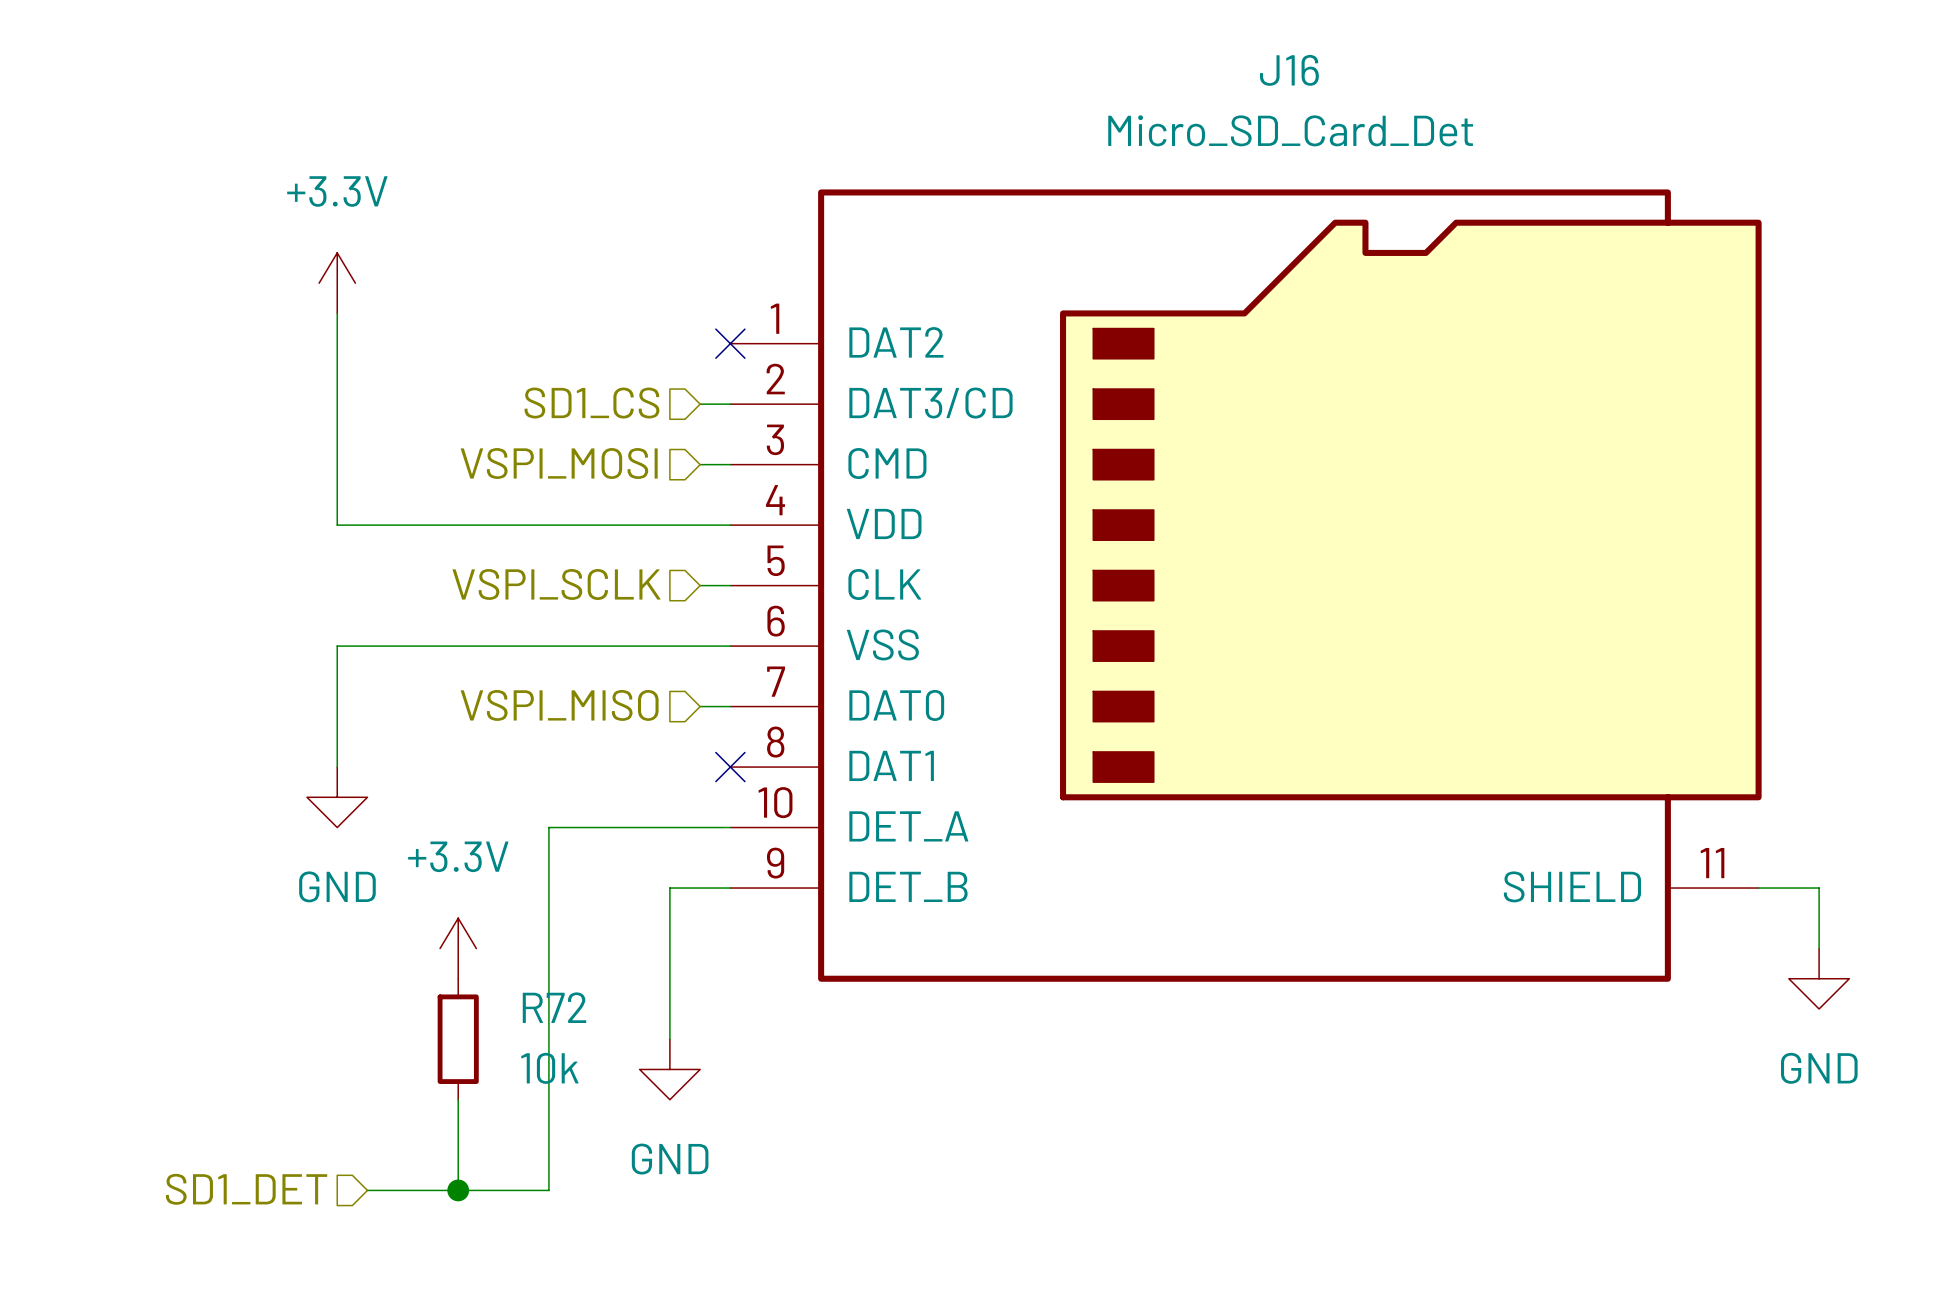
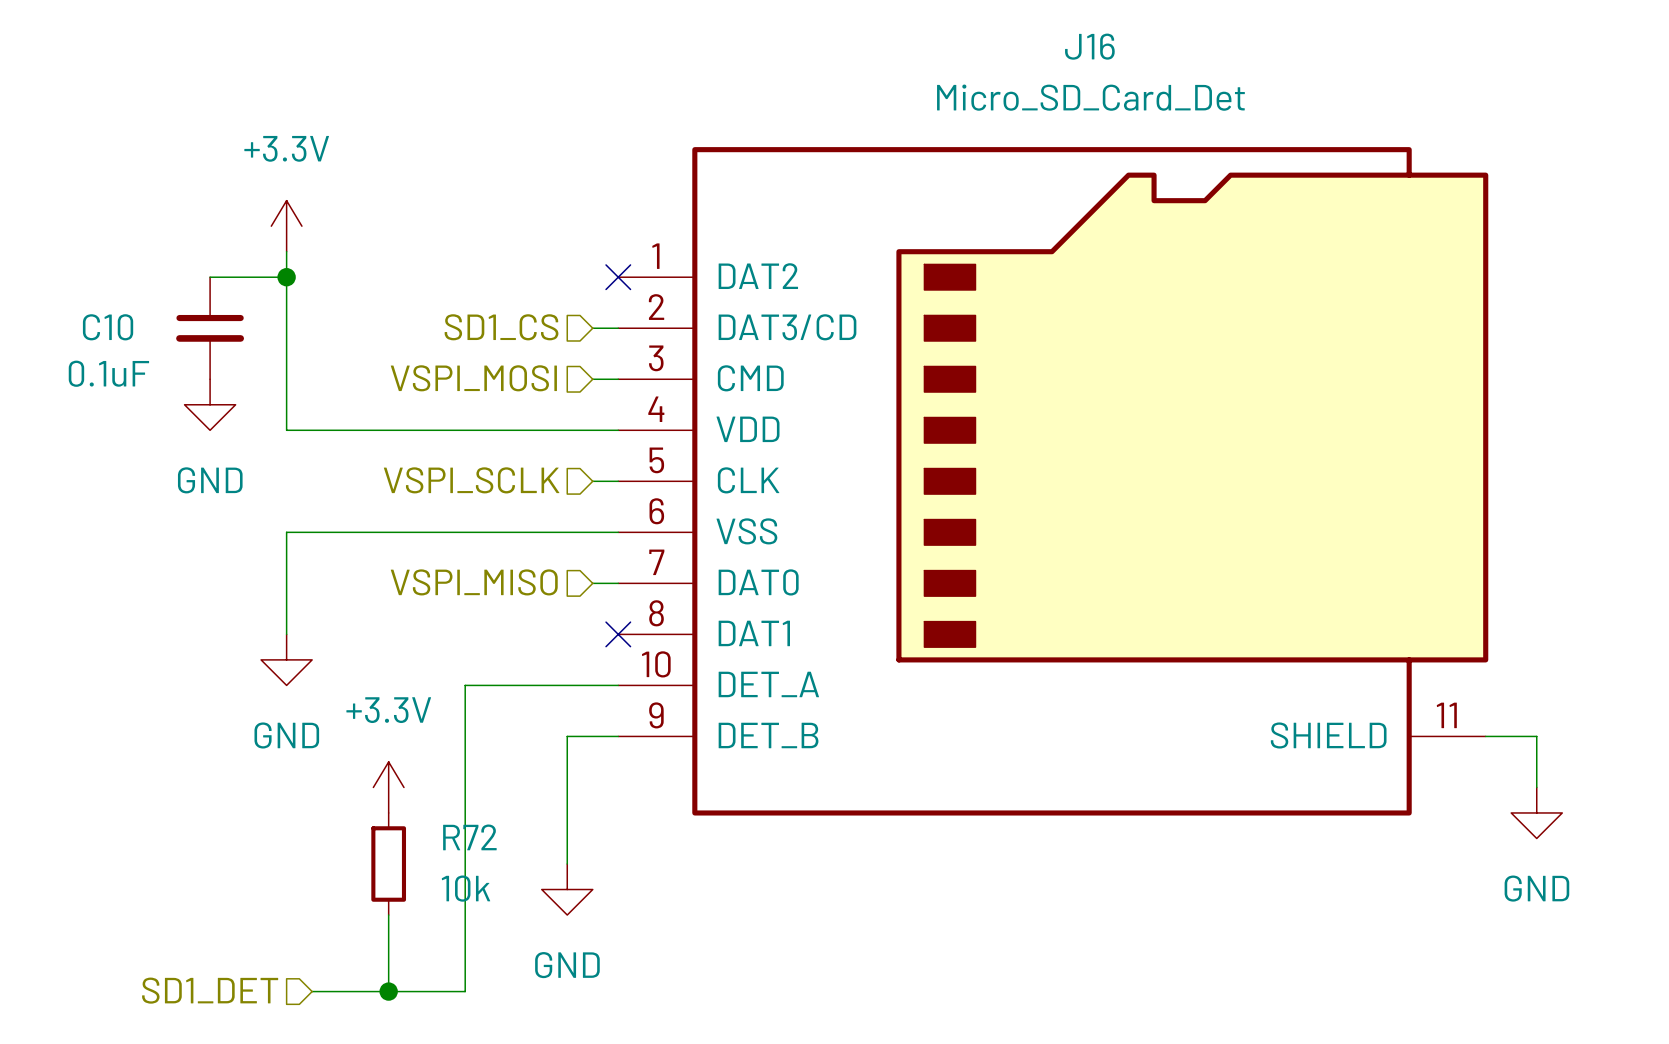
wire: none -> (210, 277) (286, 277)
junction: none -> (286, 277)
C10: none -> 0.1uF (210, 328)
power symbol: none -> GND (210, 404)

